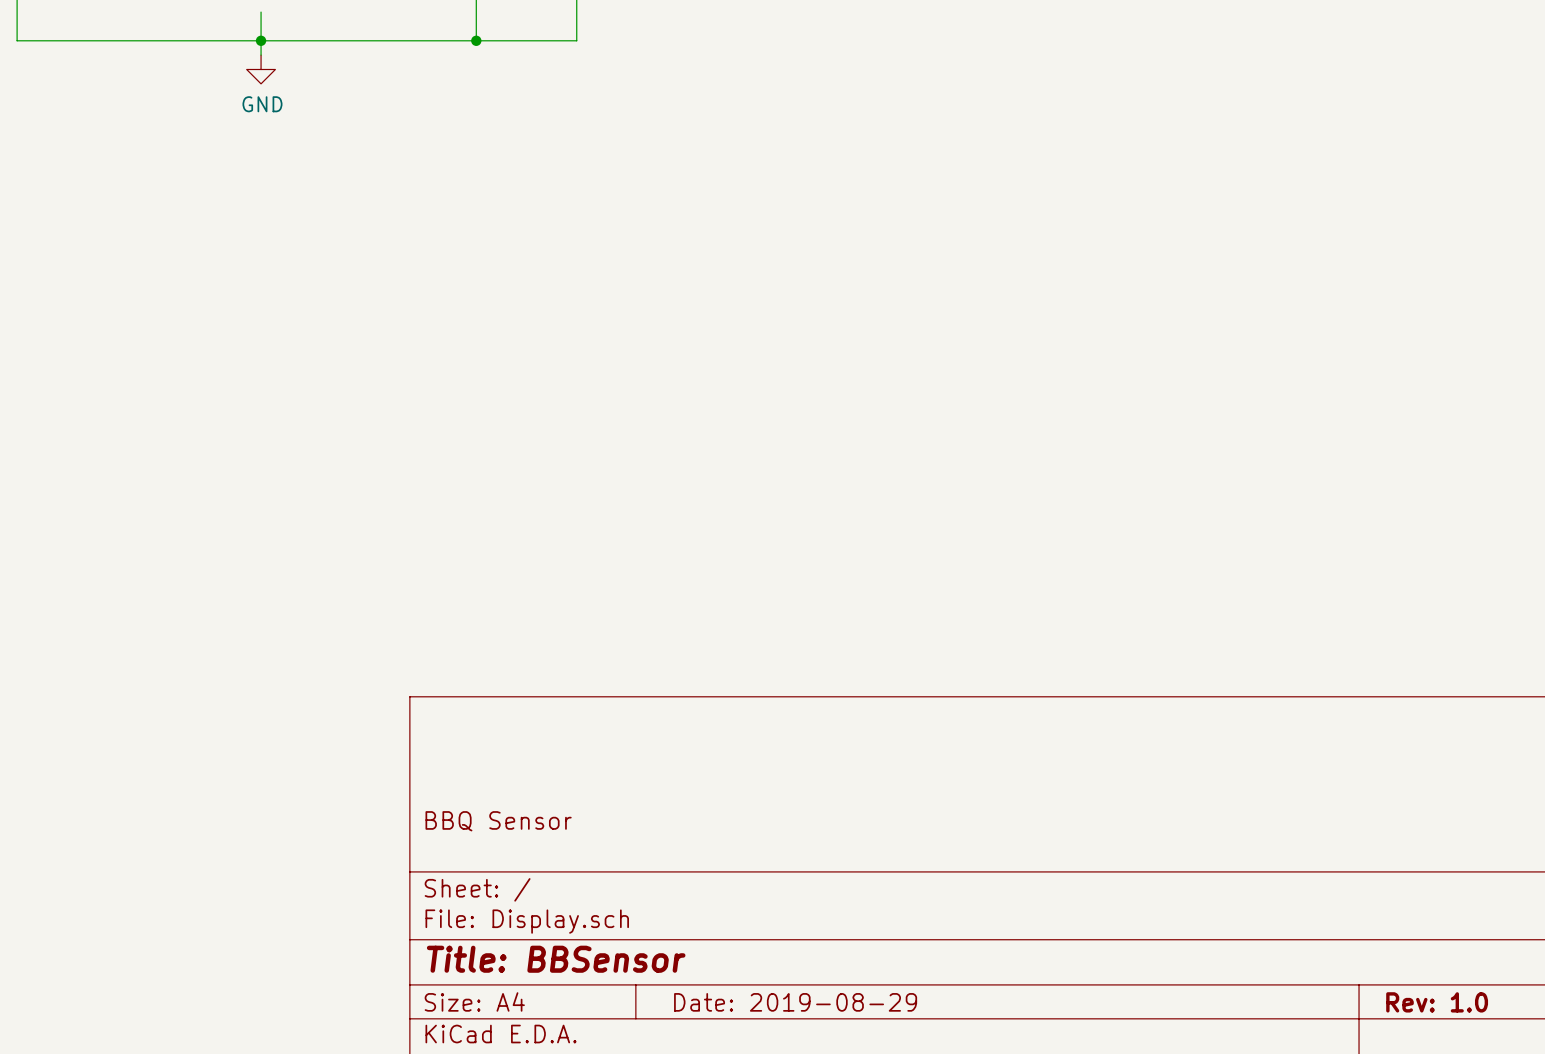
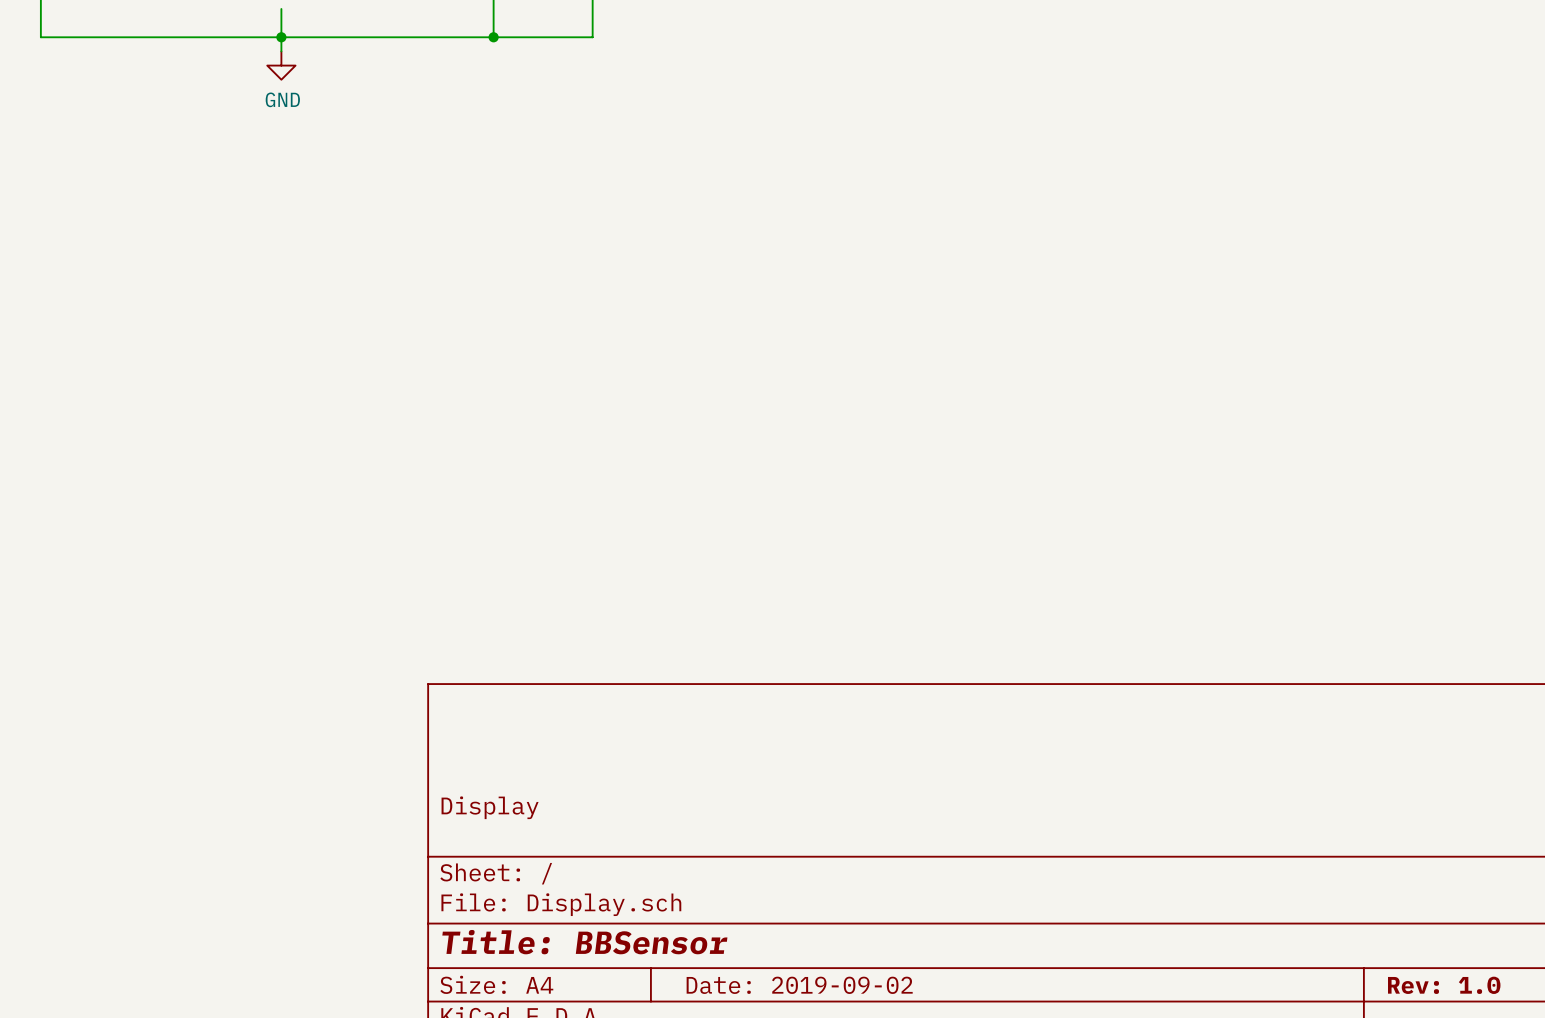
title block: BBQ Sensor (498, 821) -> Display (490, 807)
title block: Date: 2019-08-29 (795, 1002) -> Date: 2019-09-02 (799, 985)

